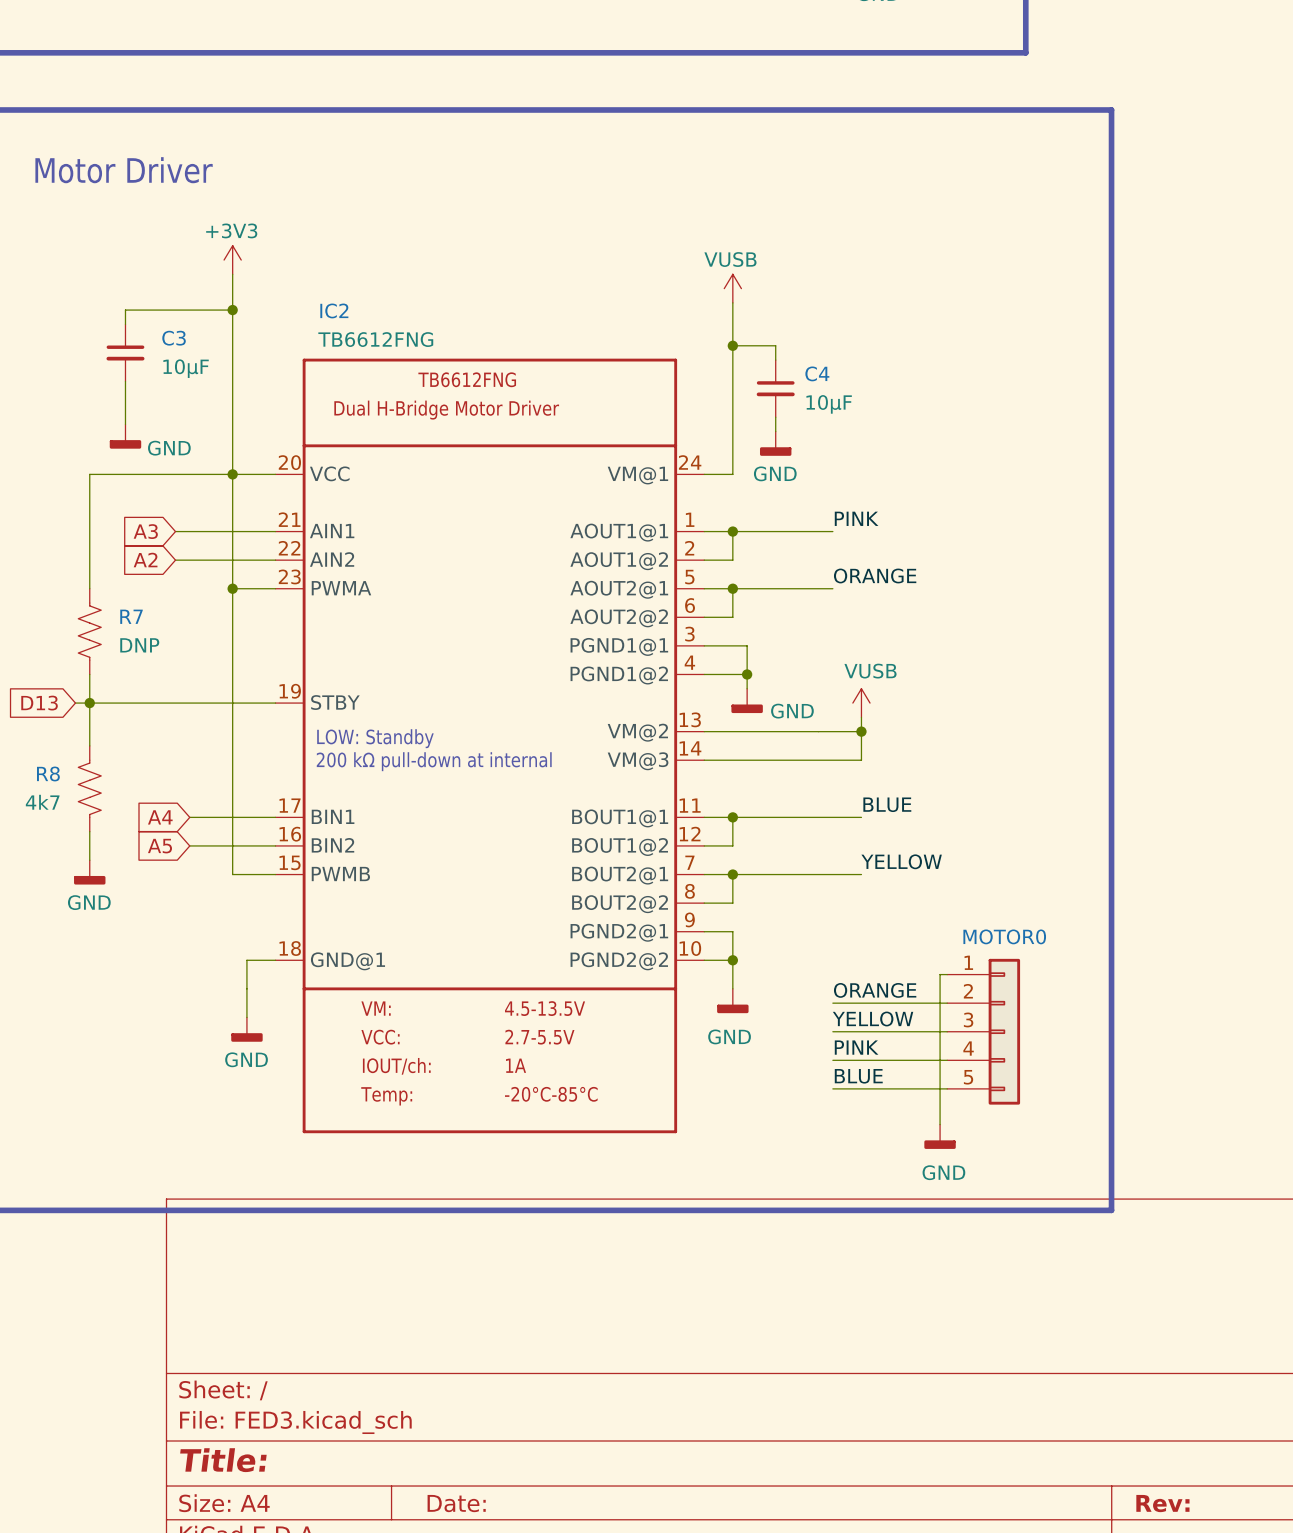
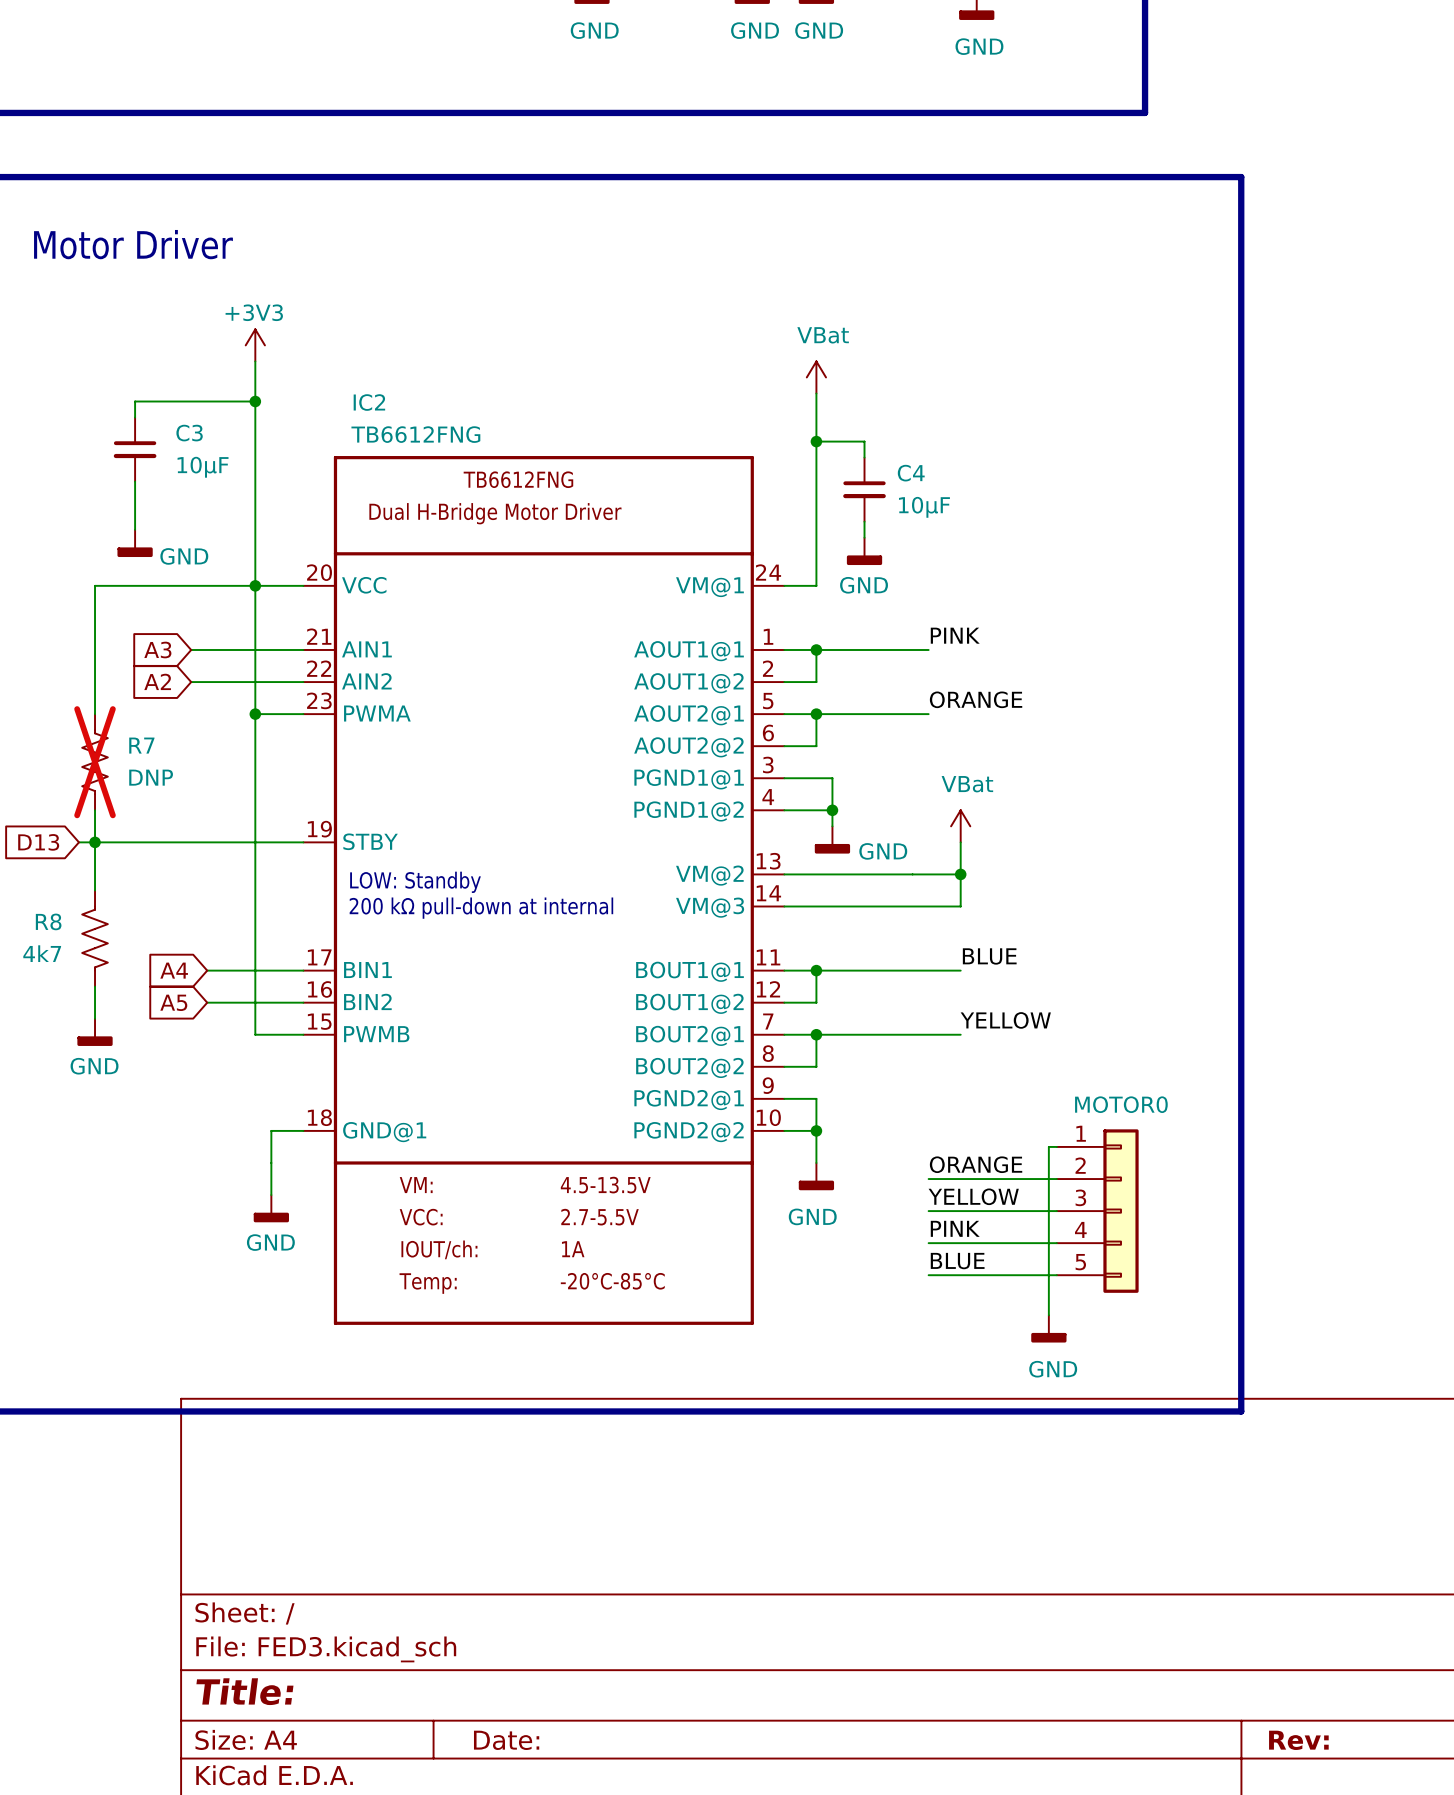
power symbol: VUSB (732, 288) -> VBat (816, 377)
R7 do-not-place cross: none -> (95, 762)
power symbol: none -> VBat (960, 826)
power symbol: VUSB (861, 703) -> none

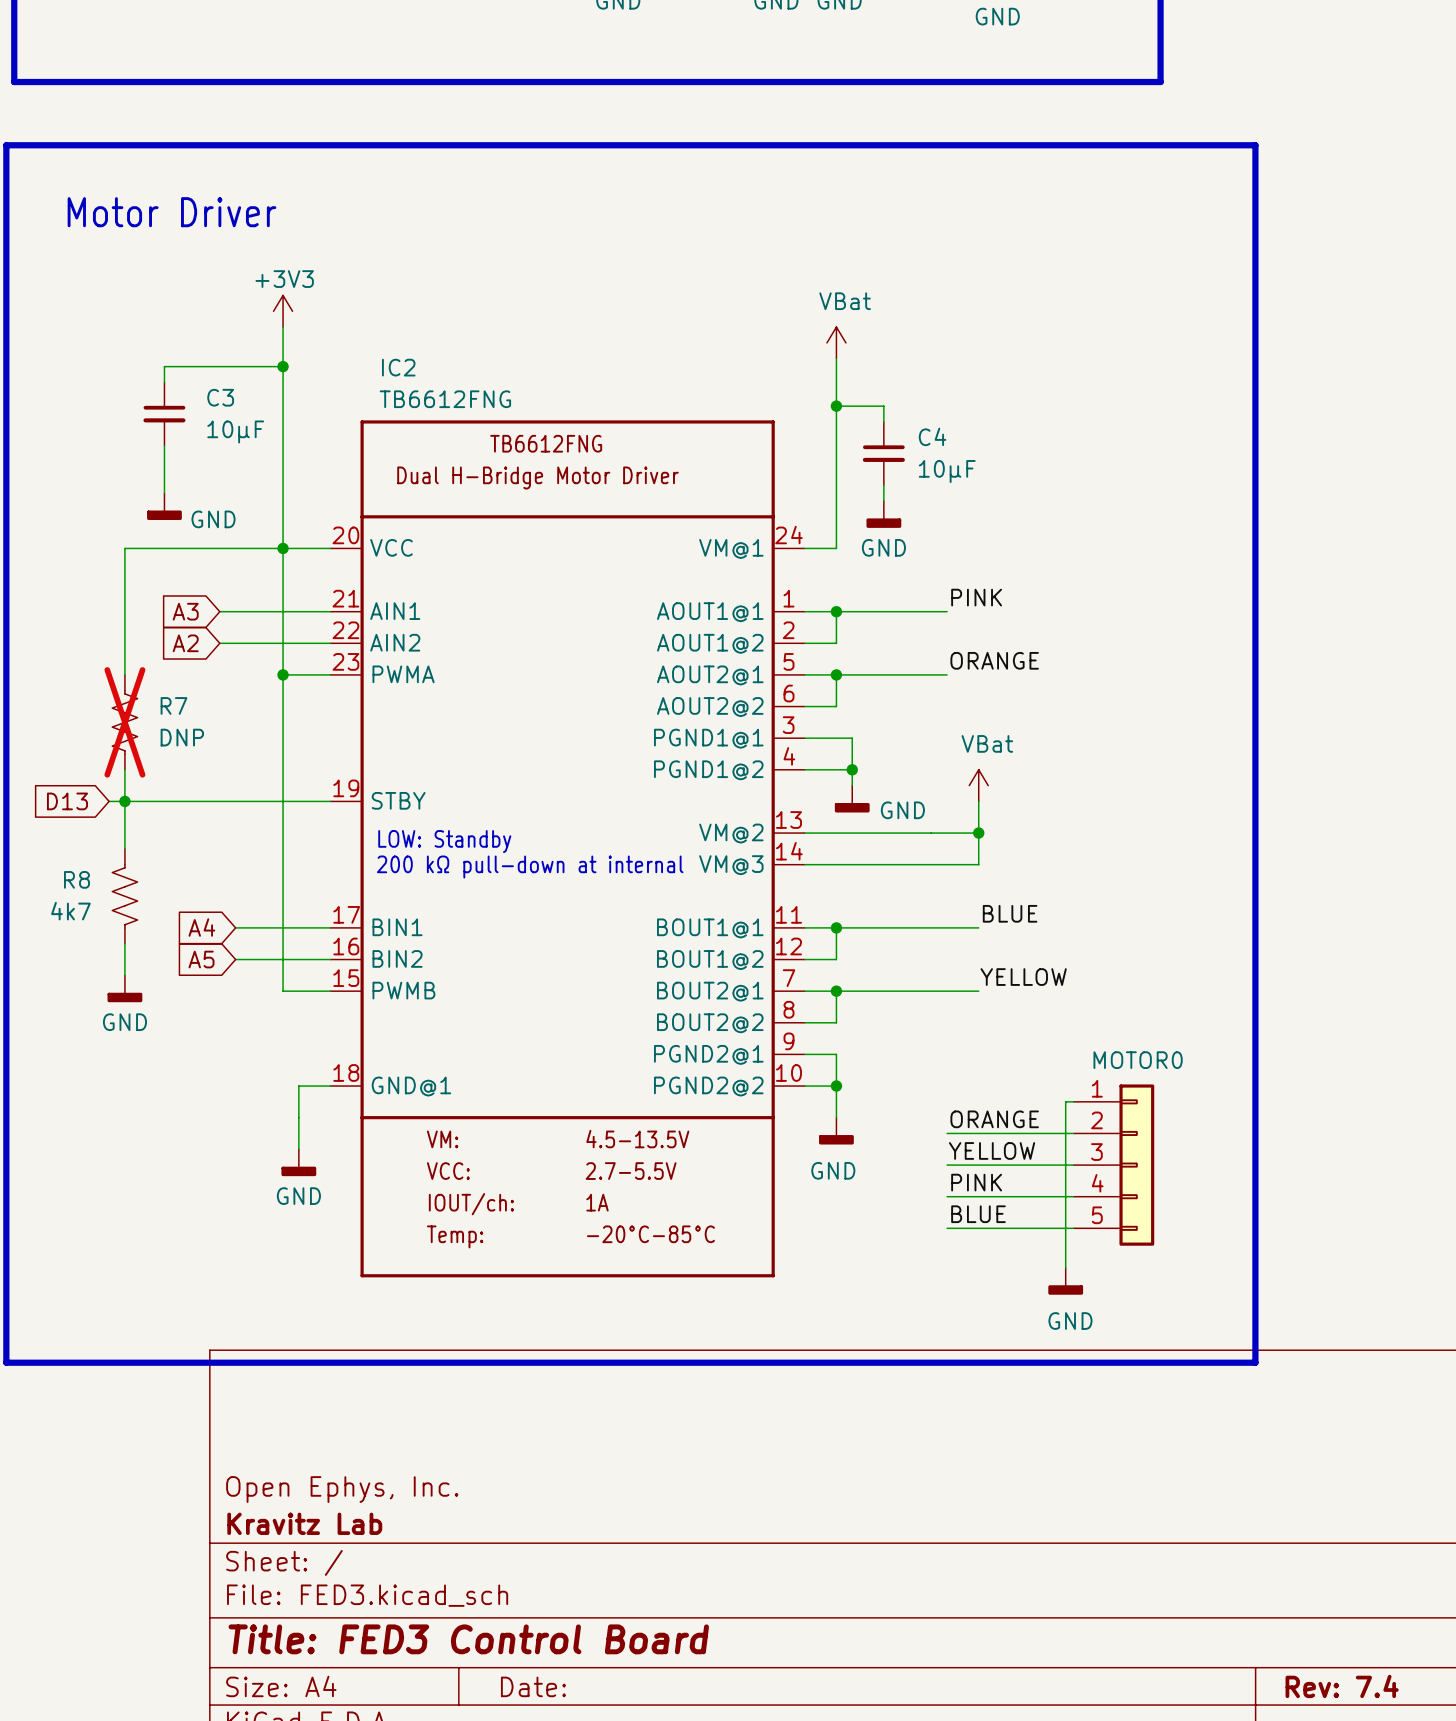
title block: none -> Open Ephys, Inc. (342, 1489)
title block: none -> Kravitz Lab (304, 1523)
title block: Title: (244, 1691) -> Title: FED3 Control Board (468, 1639)
title block: Rev: (1298, 1740) -> Rev: 7.4 (1342, 1686)

